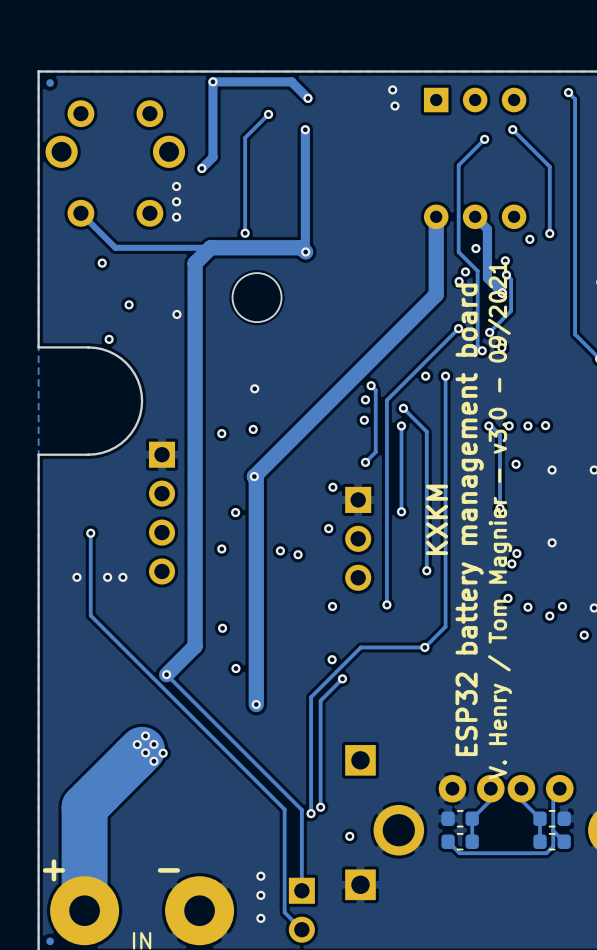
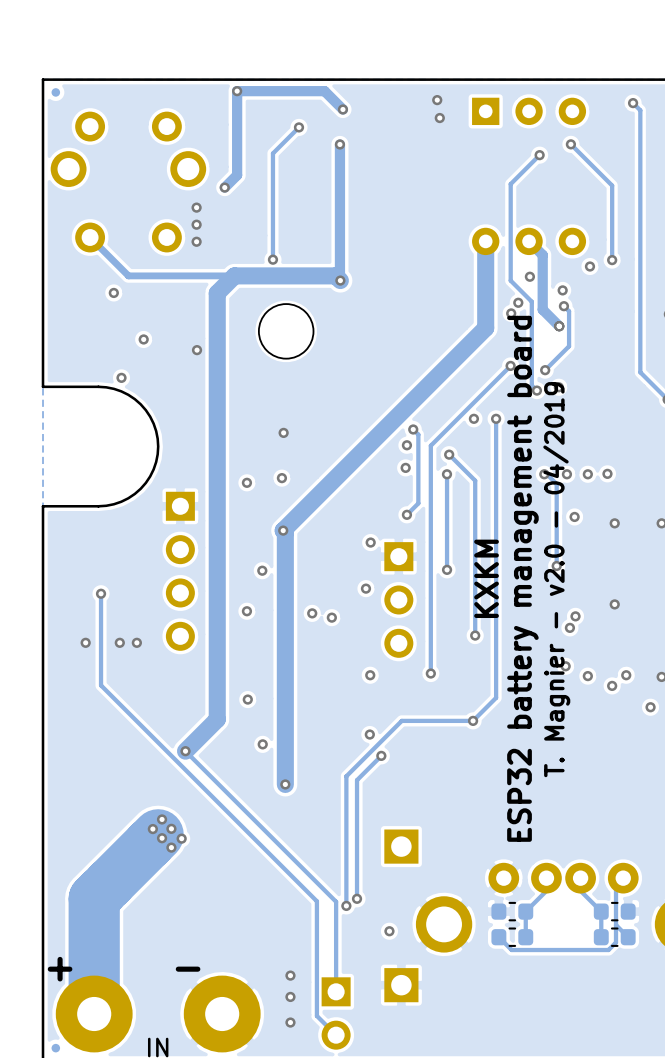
text: V. Henry / Tom Magnier - v3.0 - 09/2021 (500, 520) -> T. Magnier - v2.0 - 04/2019 (556, 579)

